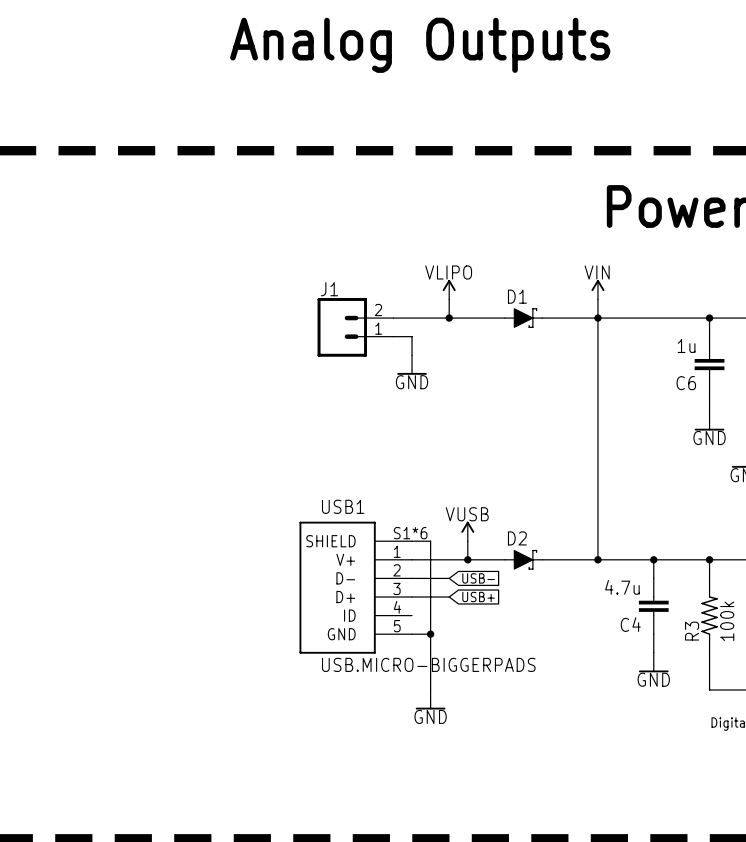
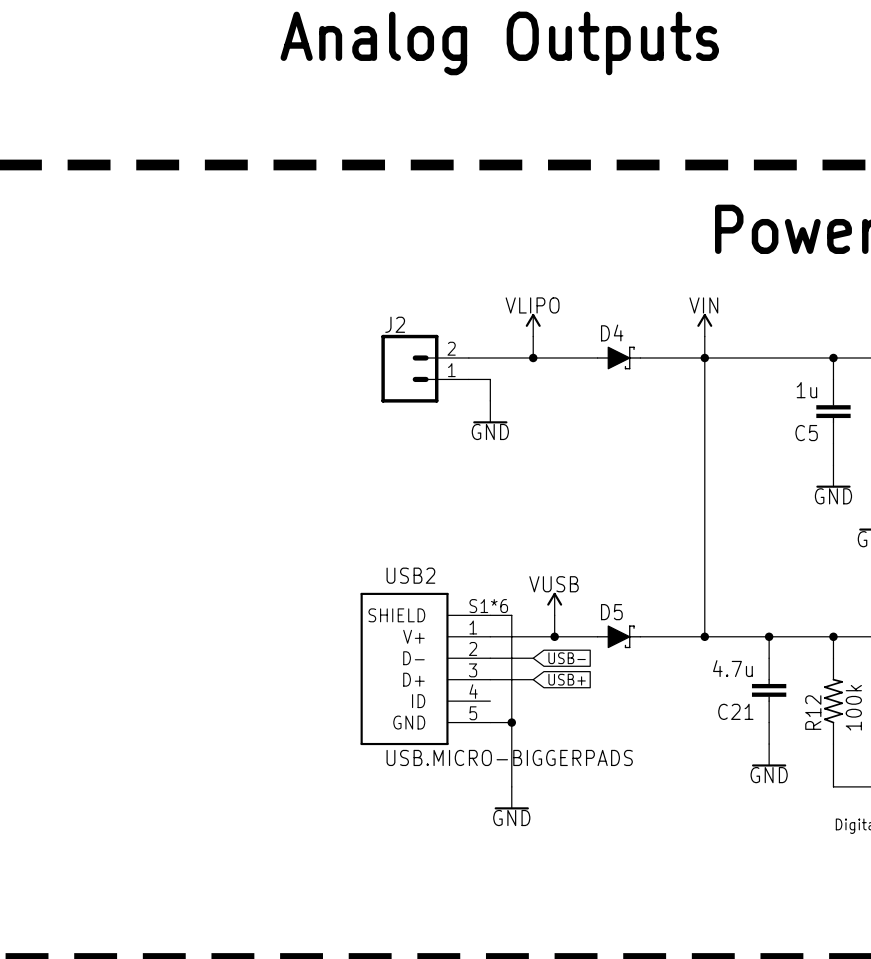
J1 name: J1 (329, 289) -> J2 (395, 324)
D1 name: D1 (517, 296) -> D4 (612, 332)
C6 name: C6 (686, 383) -> C5 (806, 433)
USB1 name: USB1 (343, 506) -> USB2 (410, 575)
D2 name: D2 (517, 538) -> D5 (611, 612)
C4 name: C4 (630, 624) -> C21 (735, 711)
R3 name: R3 (692, 631) -> R12 (813, 712)

